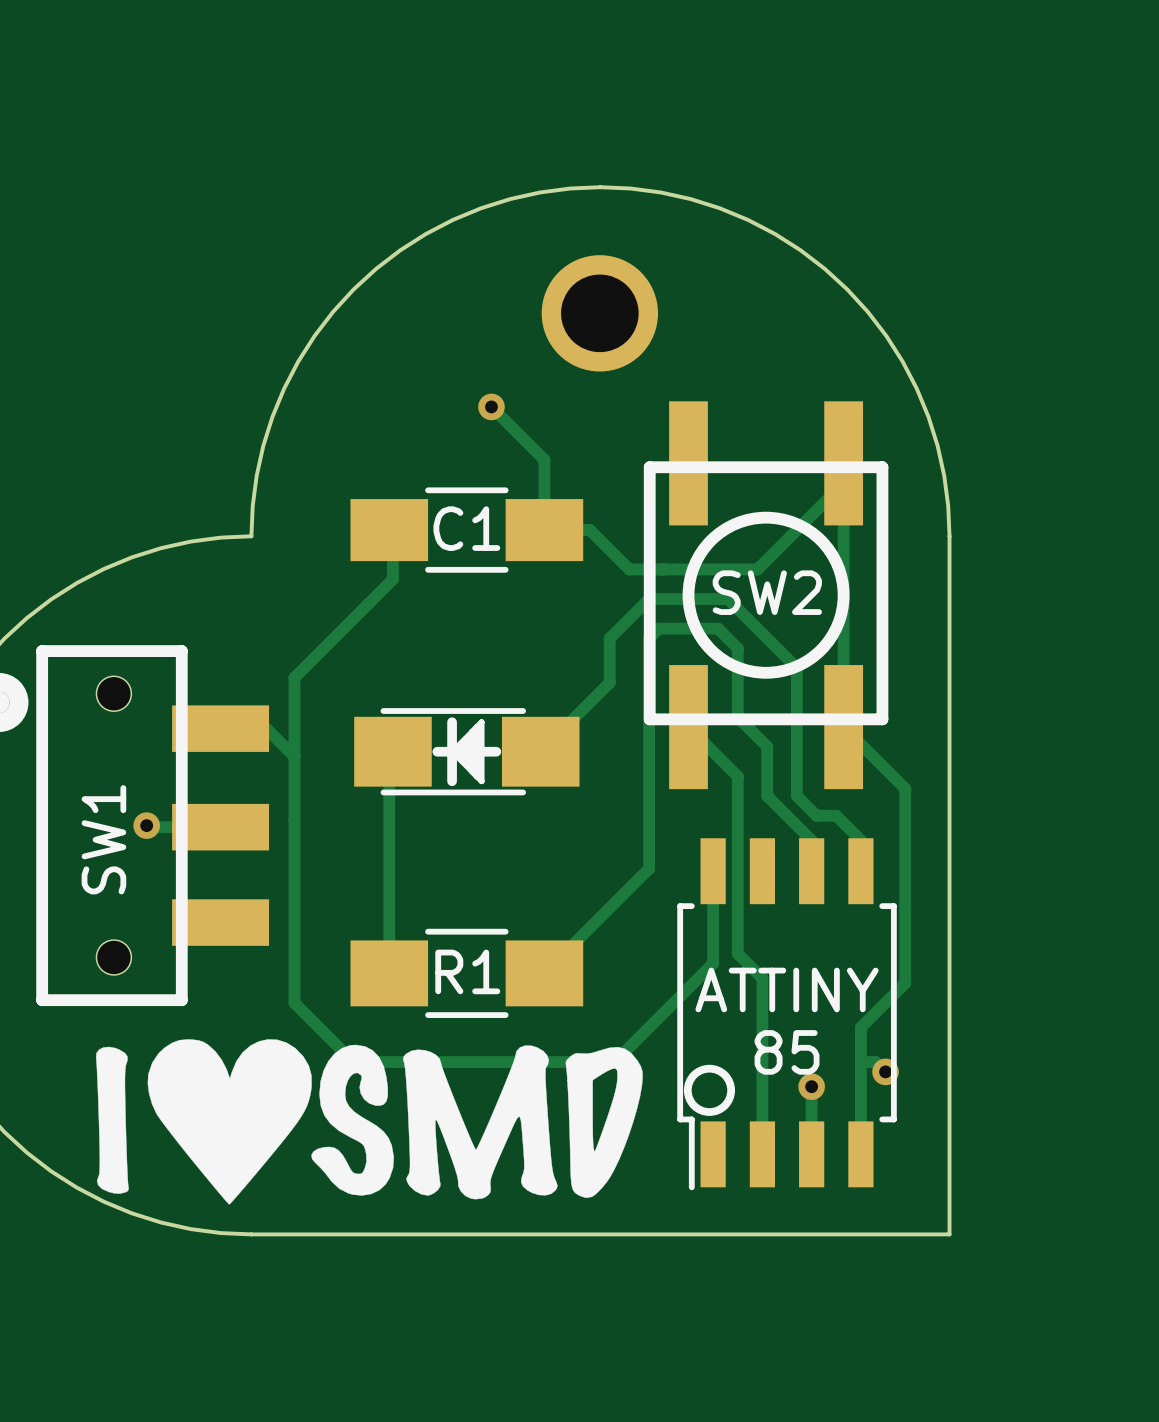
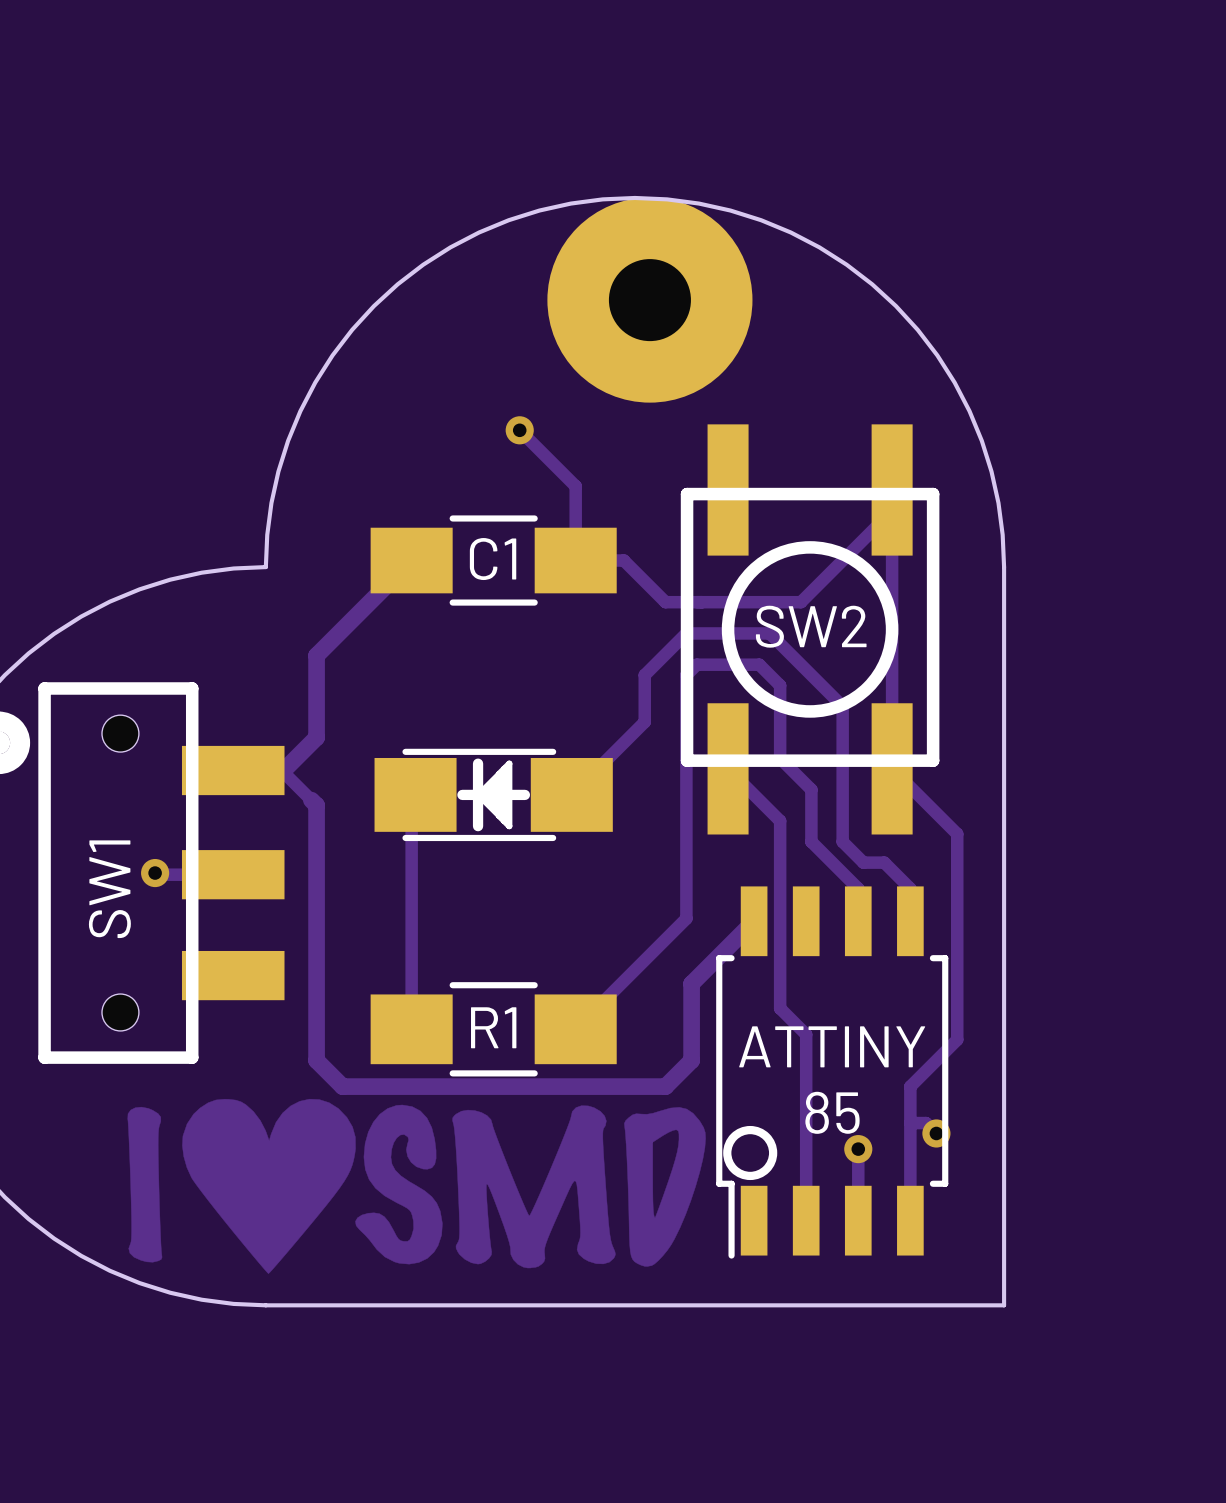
part footprint: [541, 255, 659, 372] -> [547, 197, 753, 403]
track: none -> (411, 560) (316, 655) (316, 737) (281, 770)
track: (392, 533) (392, 579) (294, 677) (294, 1002) (353, 1062) (614, 1062) (713, 963) (713, 871) -> (311, 800) (316, 805) (316, 1060) (342, 1086) (665, 1086) (691, 1060) (691, 983) (754, 921)
drawing shape: [96, 1039, 643, 1205] -> [127, 1098, 706, 1274]

